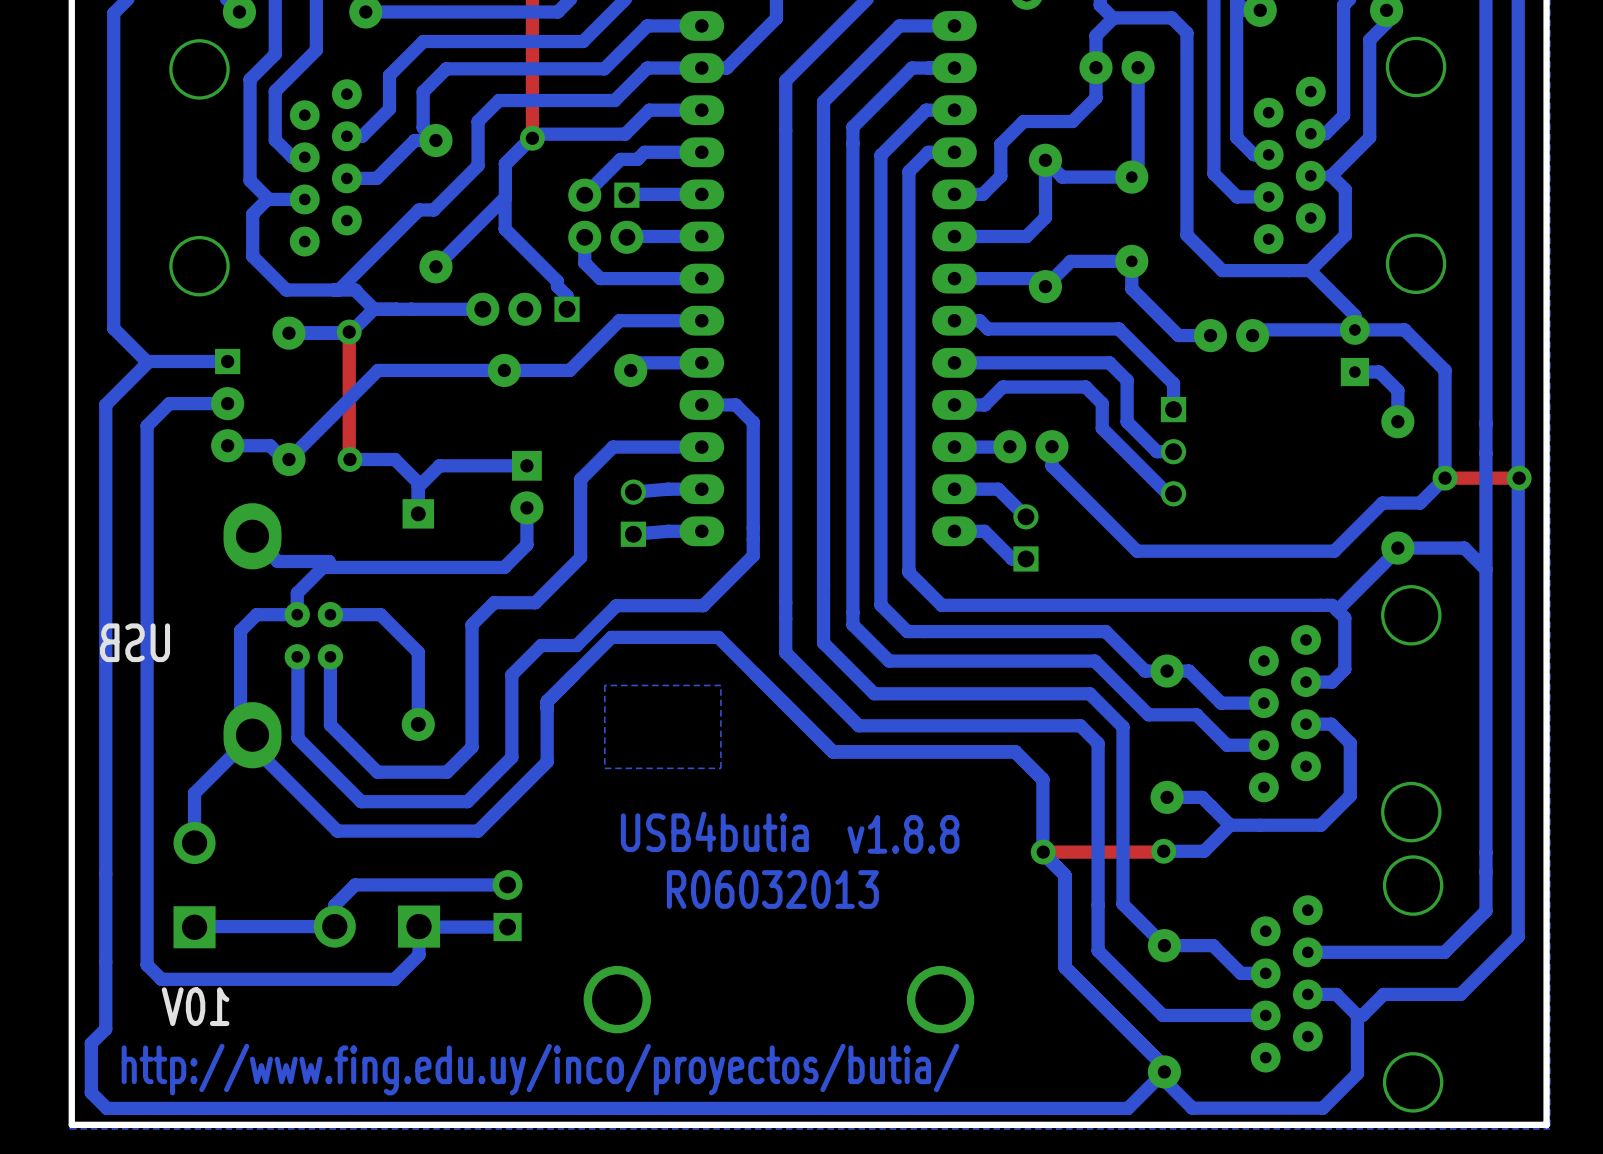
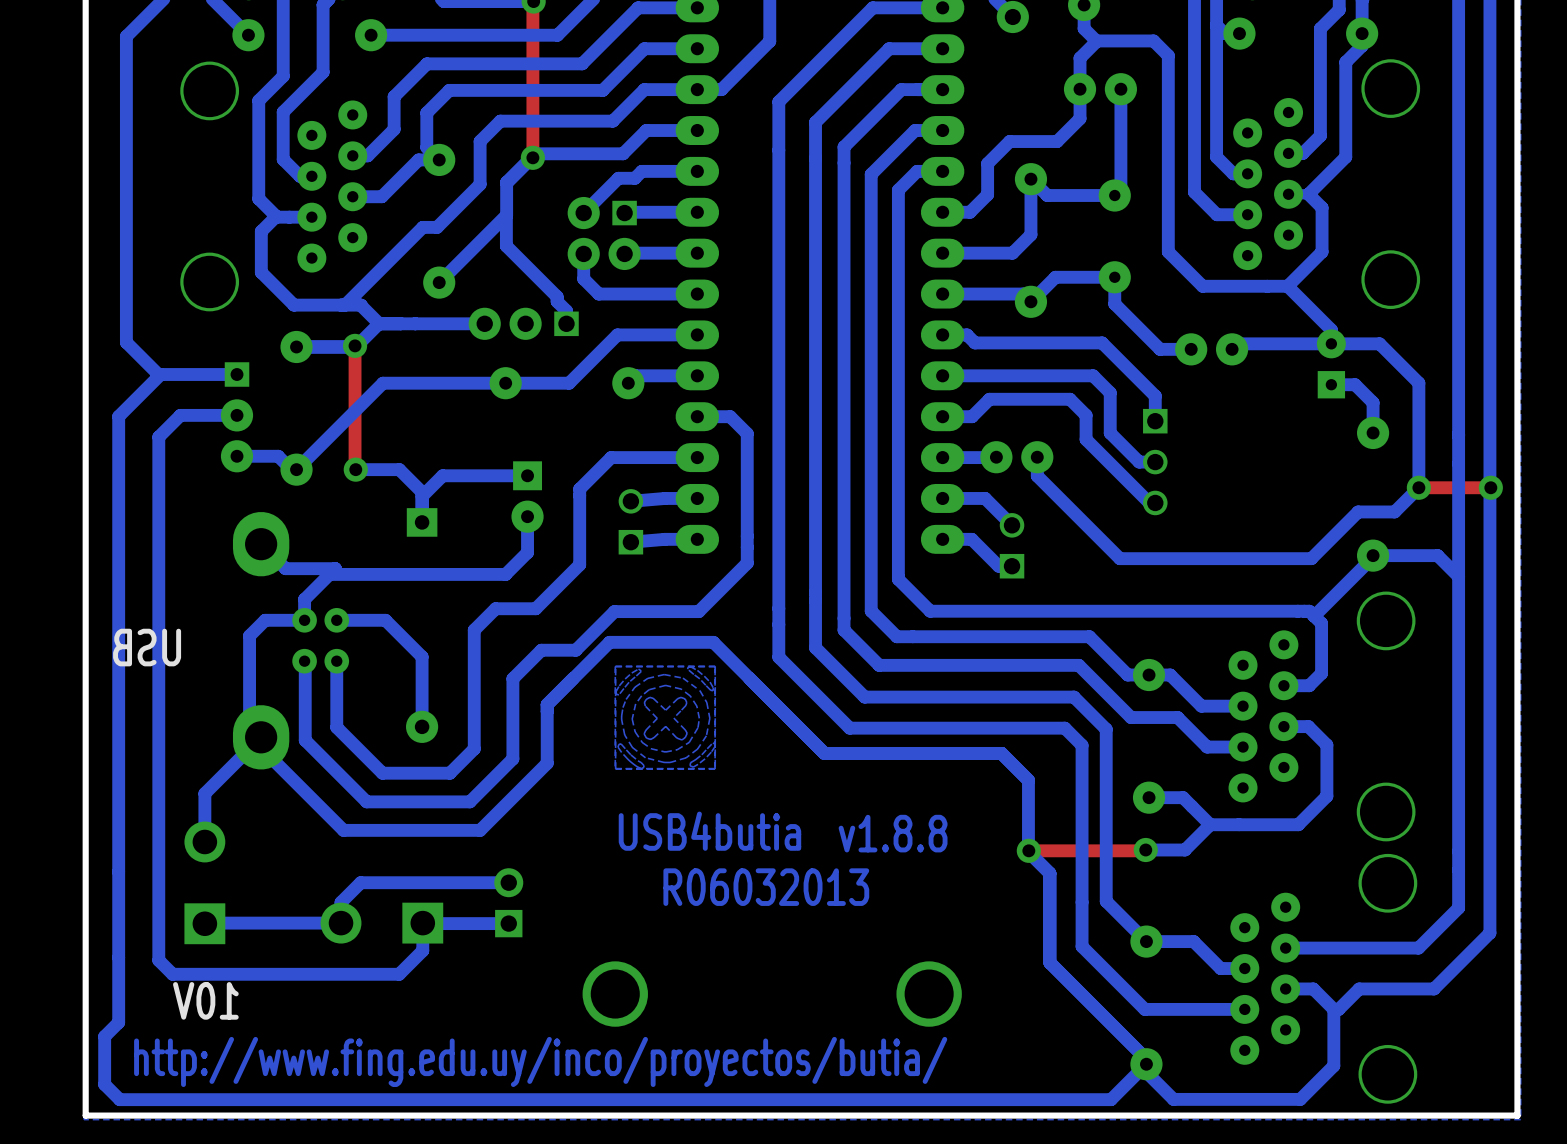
bottom zone outline: none -> (690, 666) (687, 669) (713, 690) (710, 682) (690, 666)
bottom zone outline: none -> (715, 666) (715, 768) (615, 768) (615, 666) (715, 666) (715, 768) (615, 768) (615, 666)
bottom zone outline: none -> (638, 669) (625, 678) (619, 685) (616, 694) (618, 694) (641, 671) (638, 669)
bottom zone outline: none -> (665, 685) (681, 689) (690, 695) (696, 706) (699, 718) (698, 727) (689, 742) (677, 749) (665, 752) (651, 748) (642, 742) (635, 731) (632, 719) (635, 703) (641, 695) (649, 689) (665, 685)
bottom zone outline: (720, 685) (720, 768) (604, 768) (604, 685) (720, 685) -> (664, 674) (682, 678) (699, 690) (706, 702) (709, 718) (706, 735) (697, 749) (686, 757) (670, 762) (645, 757) (632, 747) (624, 734) (621, 719) (626, 699) (634, 687) (647, 678) (664, 674)
bottom zone outline: none -> (681, 697) (665, 710) (653, 698) (646, 699) (645, 706) (657, 718) (645, 730) (644, 733) (646, 738) (650, 739) (654, 737) (665, 726) (676, 738) (681, 739) (685, 737) (687, 733) (685, 730) (673, 718) (686, 705) (685, 698) (681, 697)
bottom zone outline: none -> (621, 743) (618, 747) (627, 759) (636, 766) (643, 768) (644, 765) (641, 762) (621, 743)
bottom zone outline: none -> (712, 742) (701, 754) (690, 762) (690, 765) (693, 767) (705, 758) (715, 746) (712, 742)

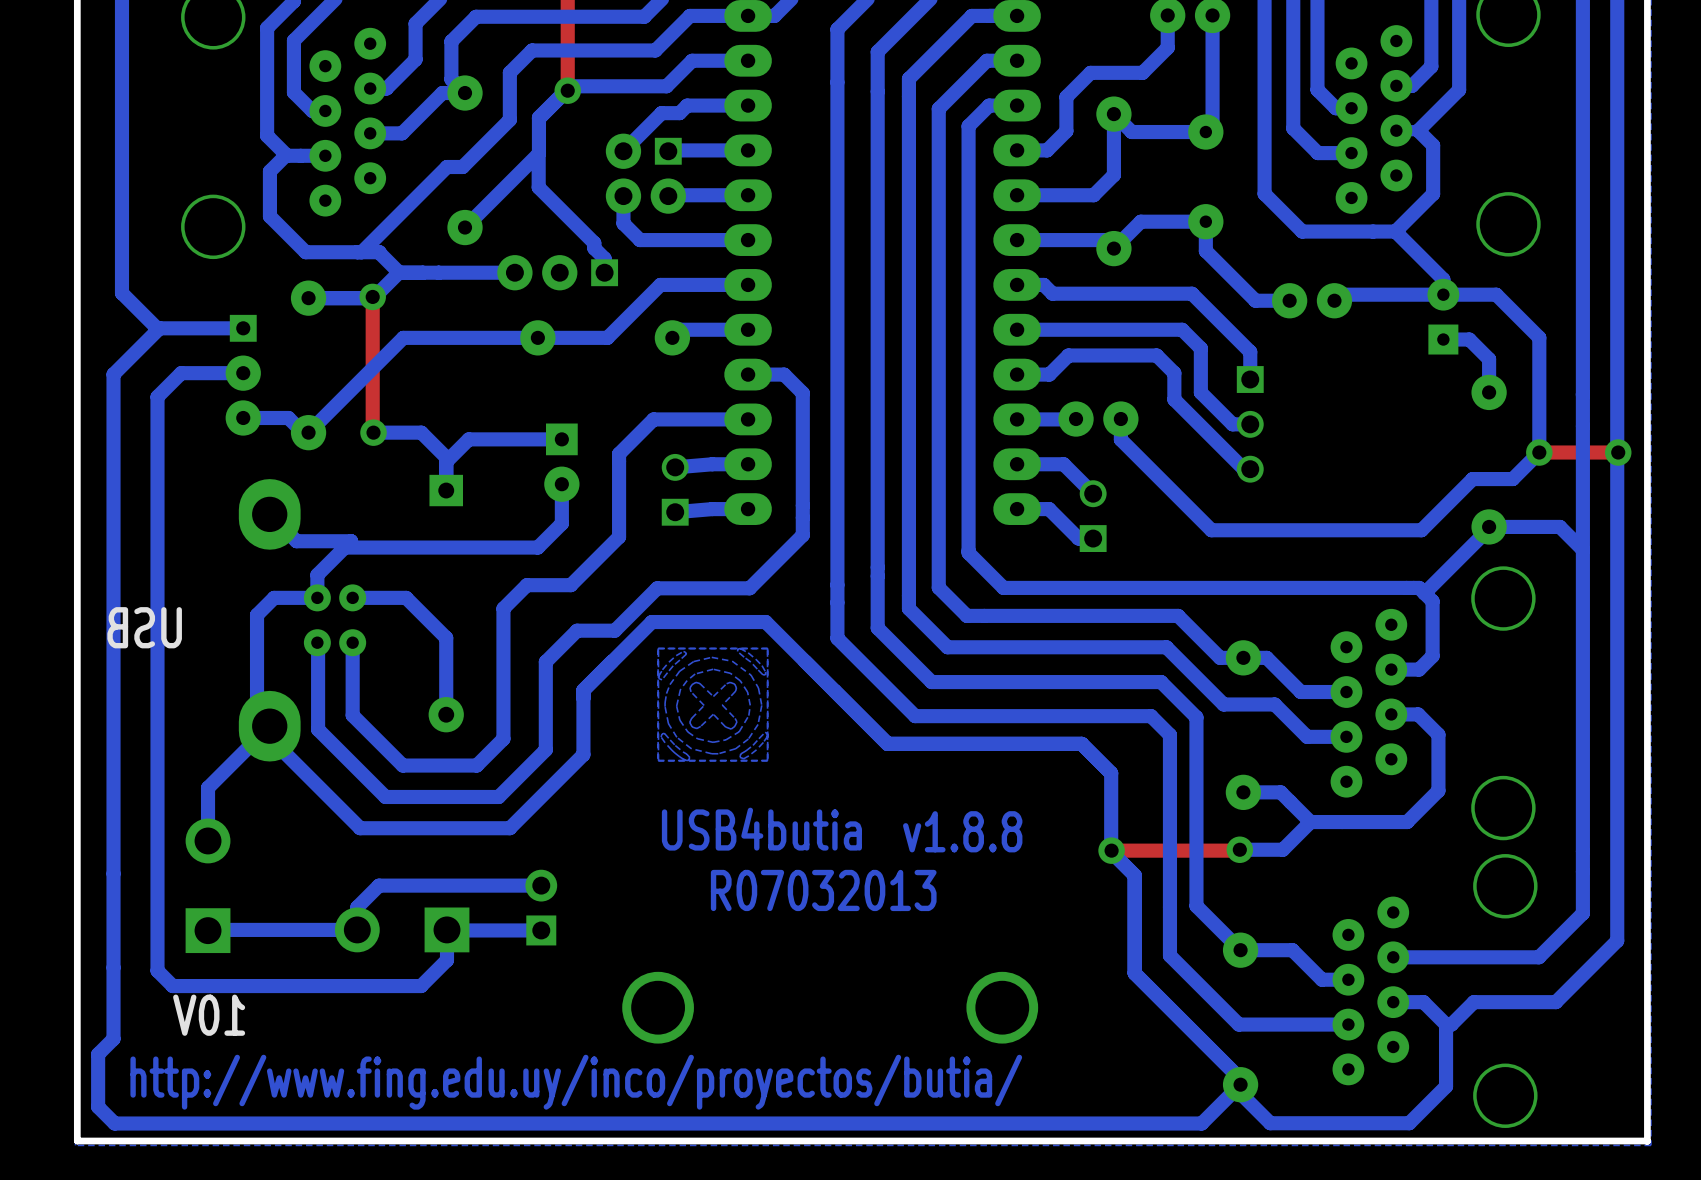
text: R06032013 (766, 887) -> R07032013 (823, 890)

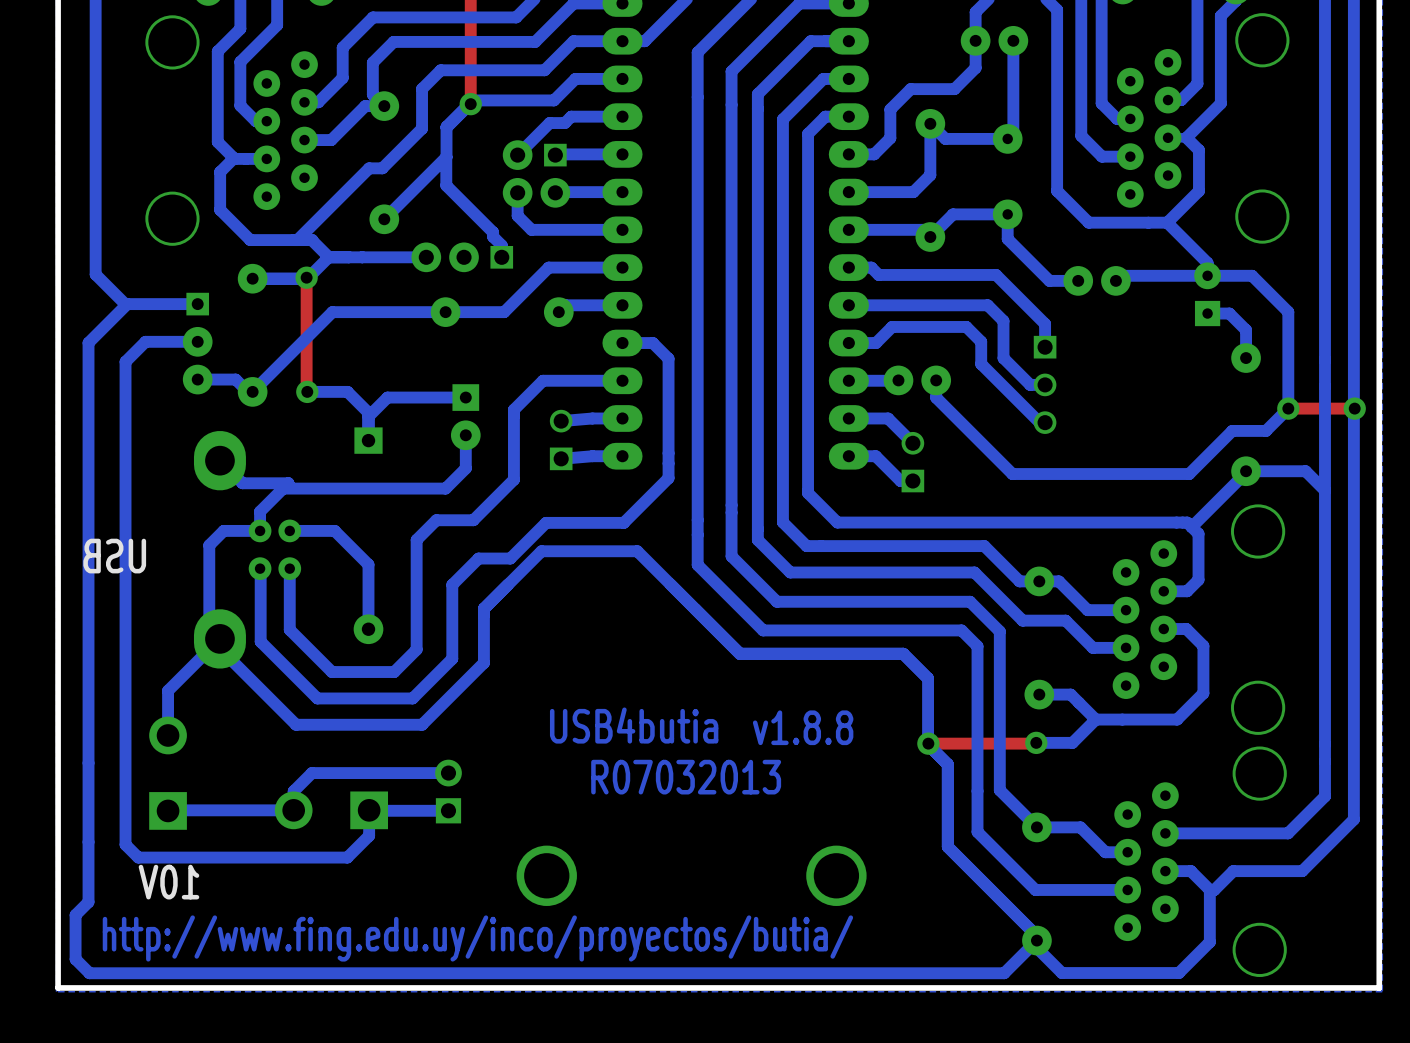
bottom zone outline: (740, 648) (737, 651) (765, 674) (762, 665) (748, 652) (740, 648) -> none
bottom zone outline: (767, 648) (767, 760) (658, 760) (658, 648) (767, 648) (767, 760) (658, 760) (658, 648) -> none
bottom zone outline: (683, 651) (668, 662) (662, 669) (658, 676) (659, 678) (662, 679) (673, 665) (686, 654) (683, 651) -> none
bottom zone outline: (711, 657) (693, 661) (679, 671) (669, 684) (665, 706) (668, 723) (676, 737) (691, 748) (718, 753) (735, 748) (748, 739) (758, 724) (761, 705) (758, 688) (750, 675) (732, 661) (711, 657) -> none
bottom zone outline: (713, 669) (730, 673) (740, 680) (747, 692) (750, 705) (748, 715) (739, 731) (725, 739) (713, 742) (697, 738) (687, 731) (679, 720) (676, 706) (680, 689) (687, 680) (695, 674) (713, 669) -> none
bottom zone outline: (730, 682) (713, 696) (699, 683) (695, 682) (692, 684) (690, 687) (691, 691) (704, 705) (691, 718) (689, 722) (692, 726) (696, 728) (700, 726) (713, 714) (725, 726) (731, 729) (734, 726) (736, 721) (735, 718) (722, 705) (735, 691) (734, 684) (730, 682) -> none
bottom zone outline: (765, 732) (753, 745) (740, 753) (740, 757) (743, 758) (756, 749) (767, 736) (765, 732) -> none
bottom zone outline: (664, 733) (661, 736) (671, 750) (681, 758) (688, 759) (689, 757) (686, 754) (675, 745) (664, 733) -> none

